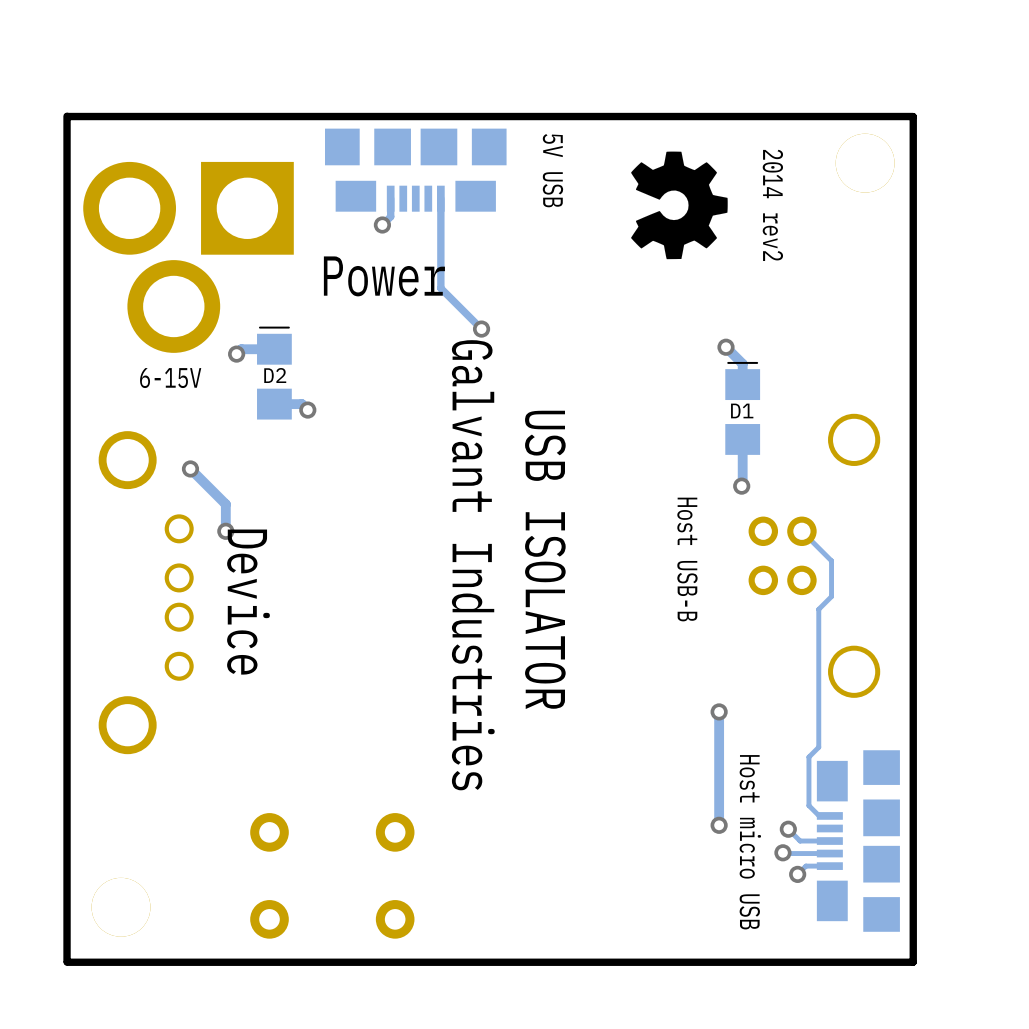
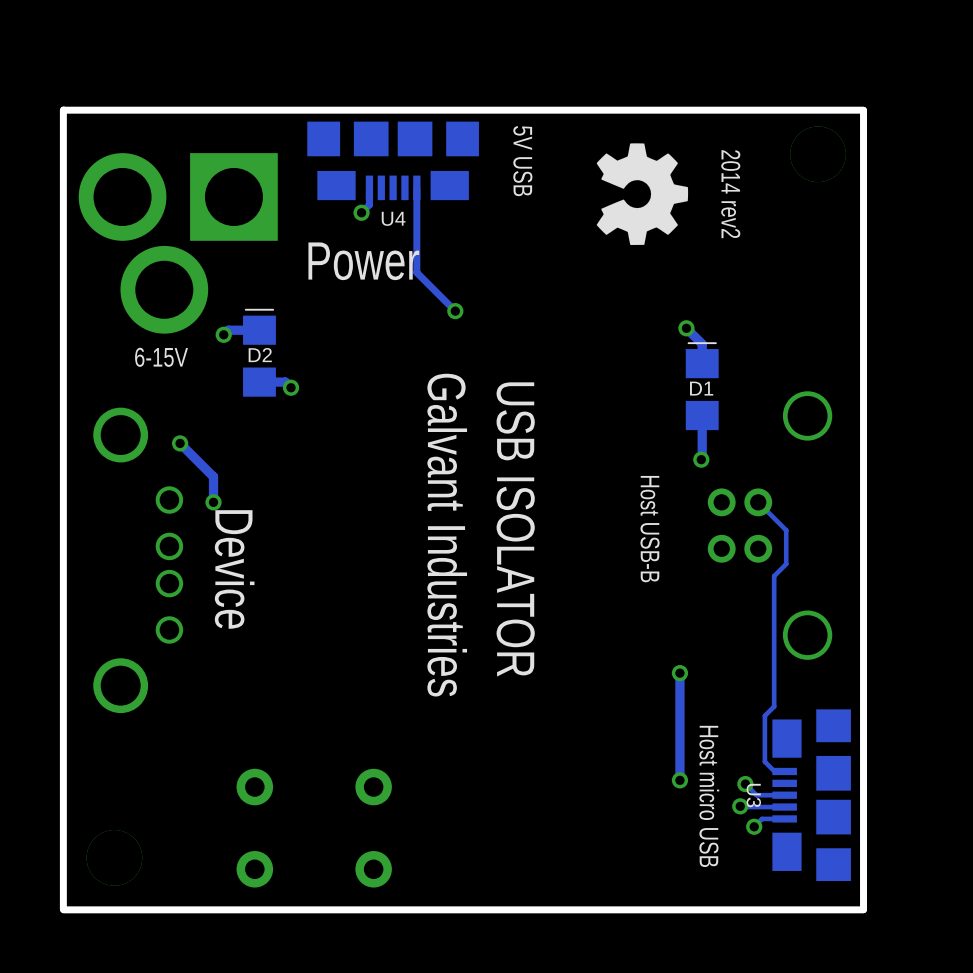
U4 name: none -> U4 (393, 218)
U3 name: none -> U3 (753, 795)

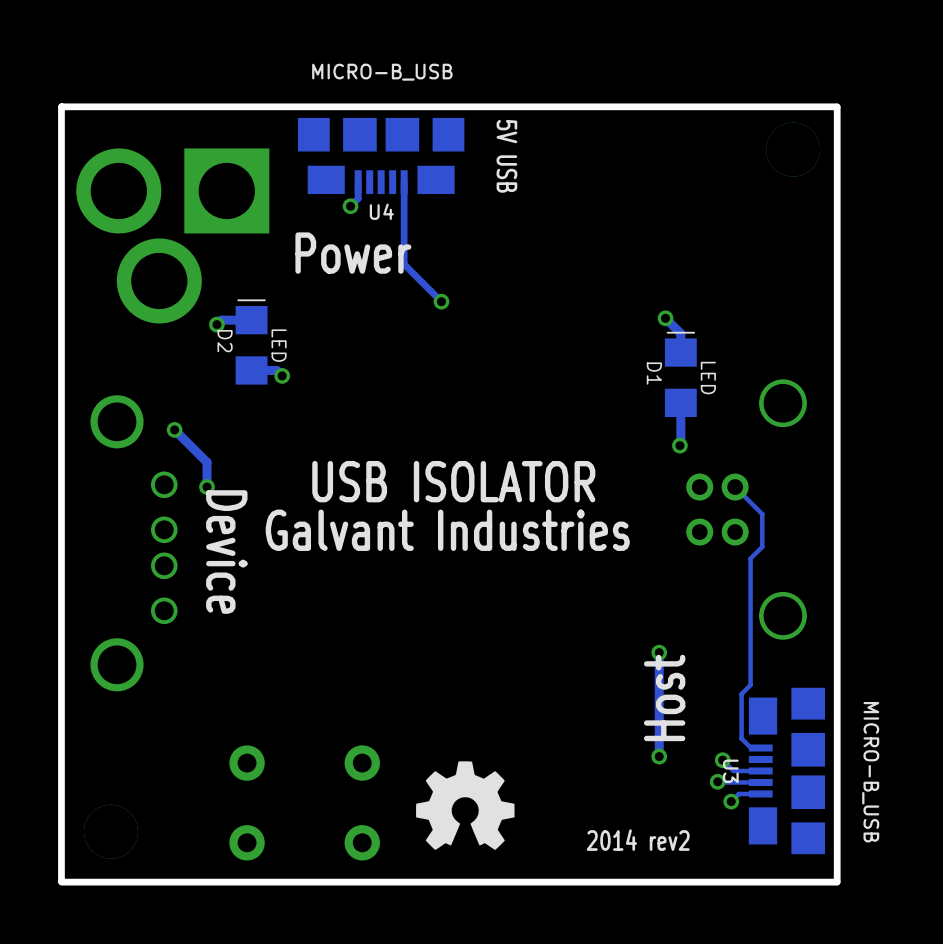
U4 value: none -> MICRO-B_USB (382, 72)
drawing: [596, 143, 689, 246] -> none
text: 2014 rev2 (730, 194) -> none
D2 name rotation: 0° (260, 355) -> 90° clockwise (225, 341)
D2 value: none -> LED (279, 345)
text: 6-15V (161, 357) -> none
D1 name rotation: 0° (701, 388) -> 90° clockwise (654, 373)
D1 value: none -> LED (708, 378)
text rotation: 0° (515, 529) -> 90° counterclockwise (453, 481)
text: Host USB-B (650, 529) -> none
text rotation: 0° (447, 535) -> 90° counterclockwise (447, 530)
text: none -> Host (664, 697)
drawing: none -> [416, 761, 515, 850]
text: Host micro USB (709, 796) -> none
U3 value: none -> MICRO-B_USB (870, 772)
text: none -> 2014 rev2 (638, 840)

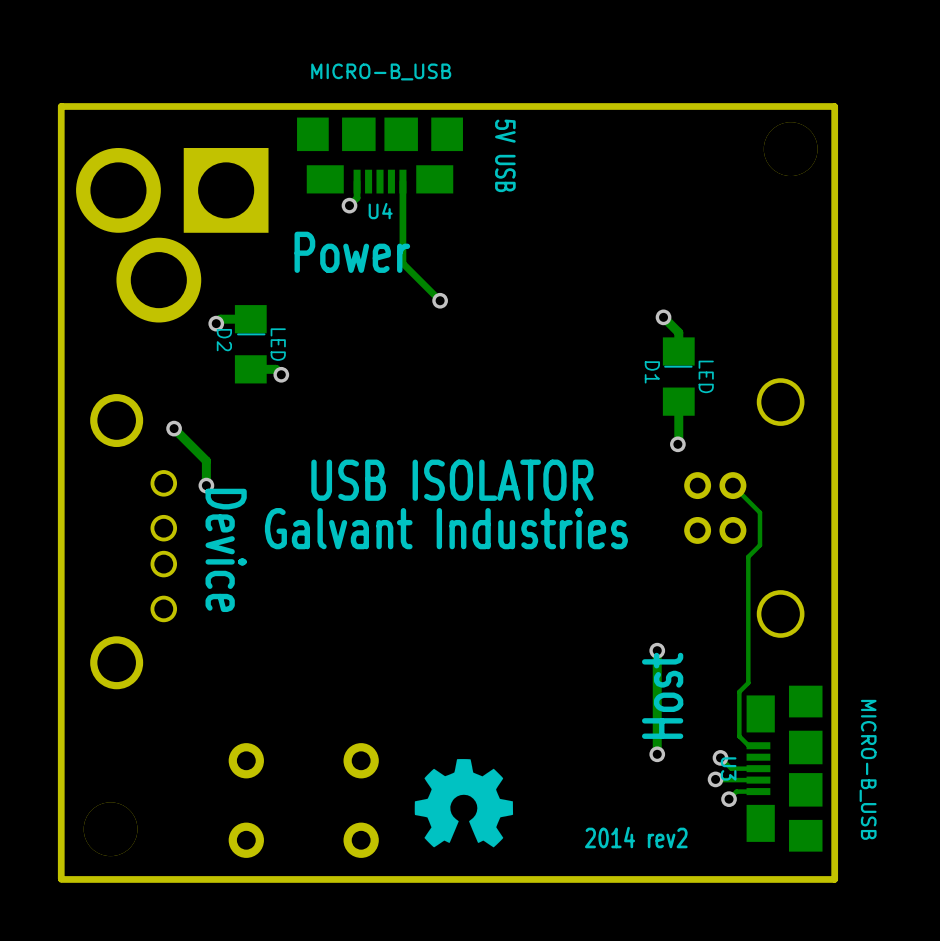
D2 footprint: [235, 299, 268, 385] -> [234, 305, 267, 384]
D1 footprint: [664, 331, 697, 418] -> [662, 337, 695, 416]

